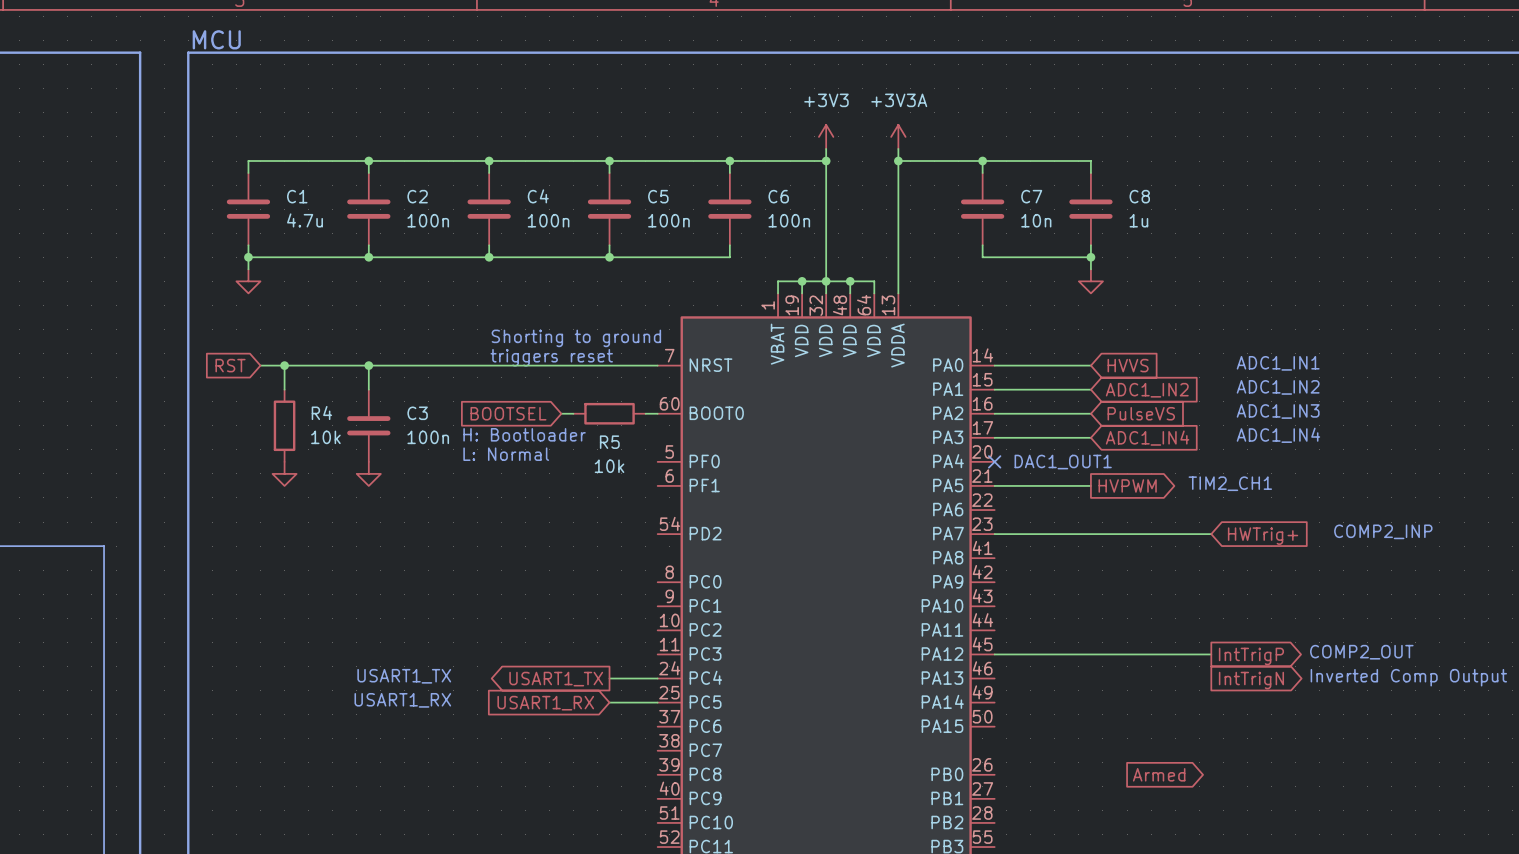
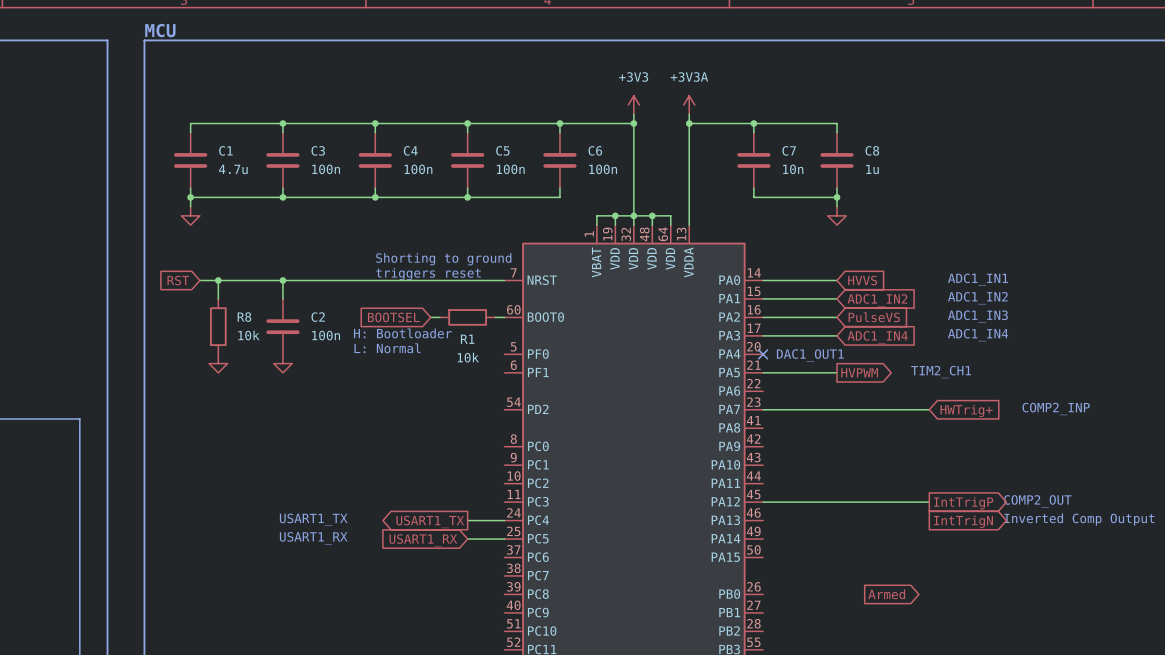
C2 name: C2 (417, 196) -> C3 (318, 150)
R4 name: R4 (321, 413) -> R8 (244, 317)
C3 name: C3 (417, 413) -> C2 (318, 317)
R5 name: R5 (609, 442) -> R1 (467, 339)

